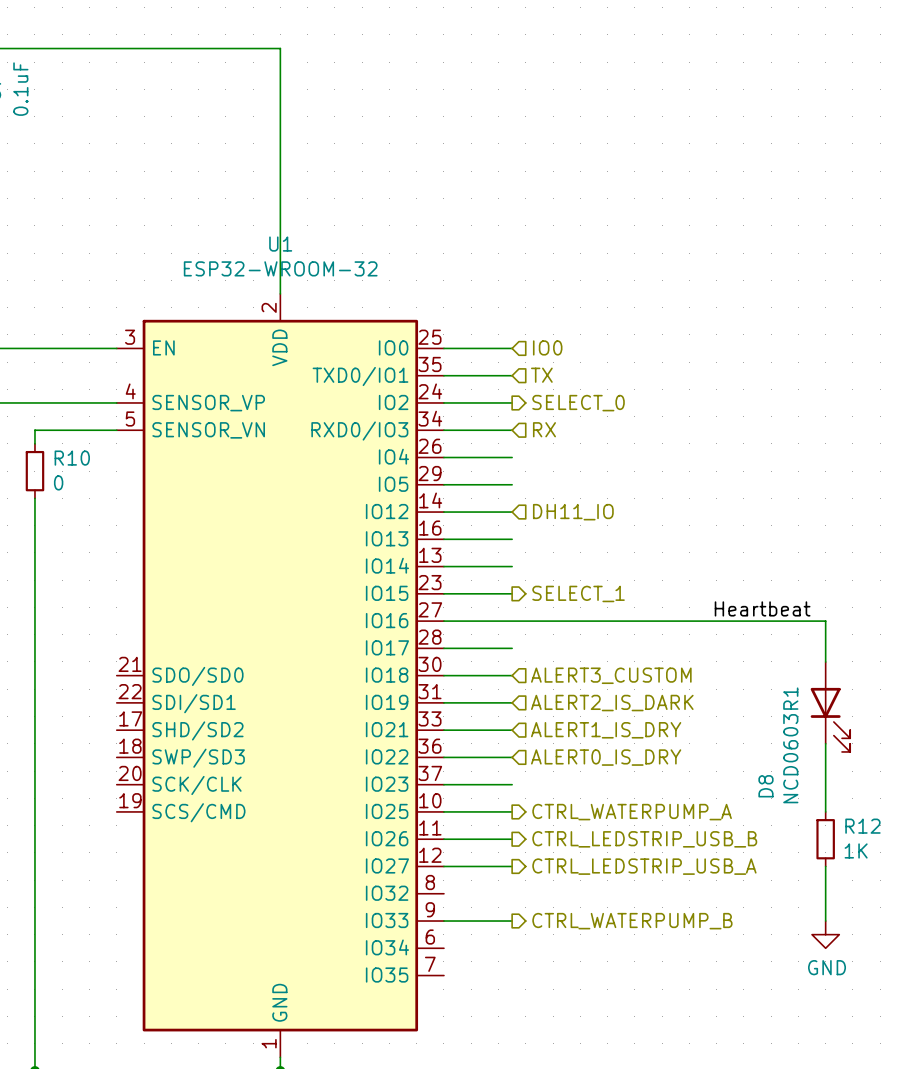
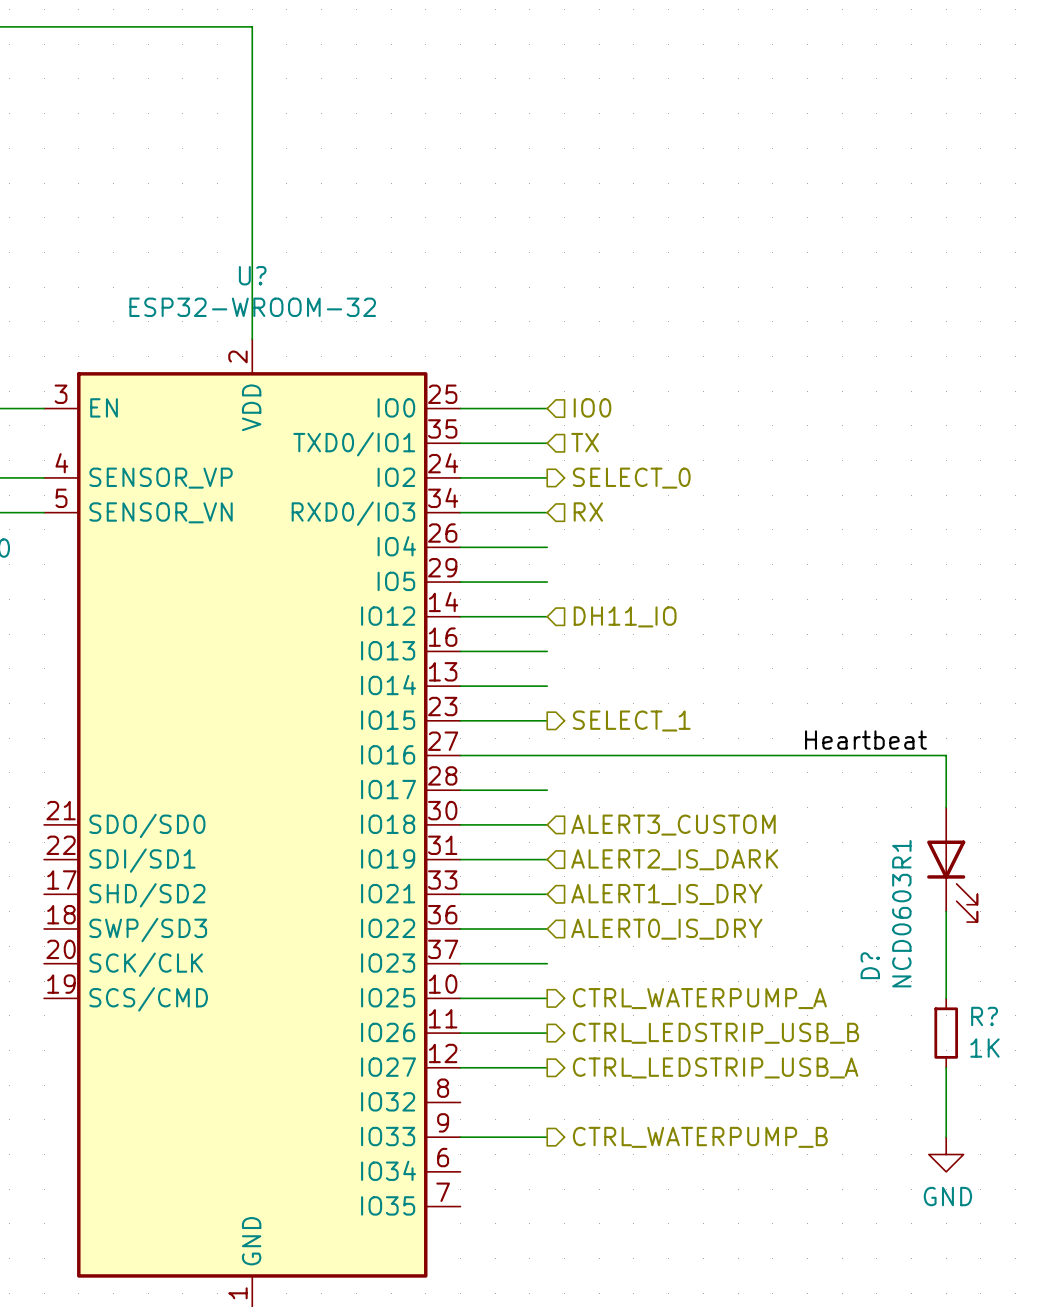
U1 name: U1 (280, 244) -> U? (252, 275)
D8 name: D8 (765, 786) -> D? (870, 965)
R12 name: R12 (862, 826) -> R? (984, 1016)

